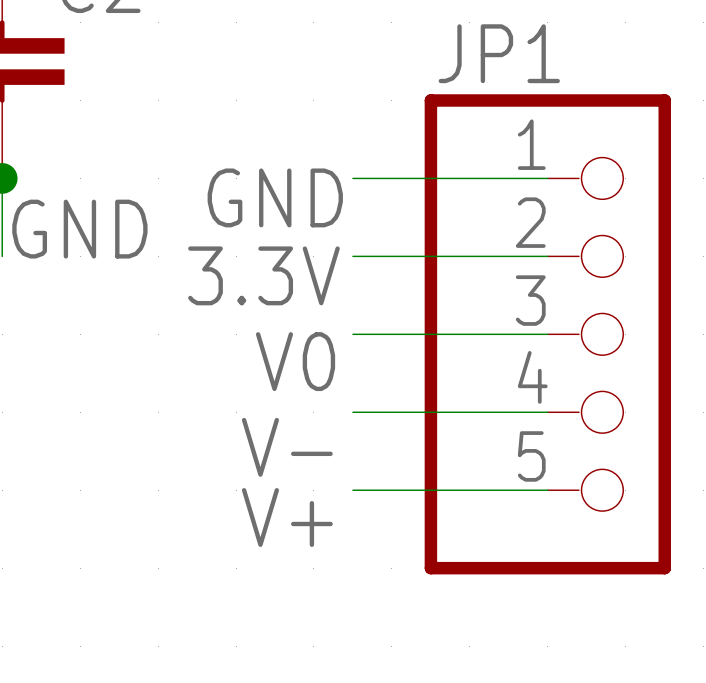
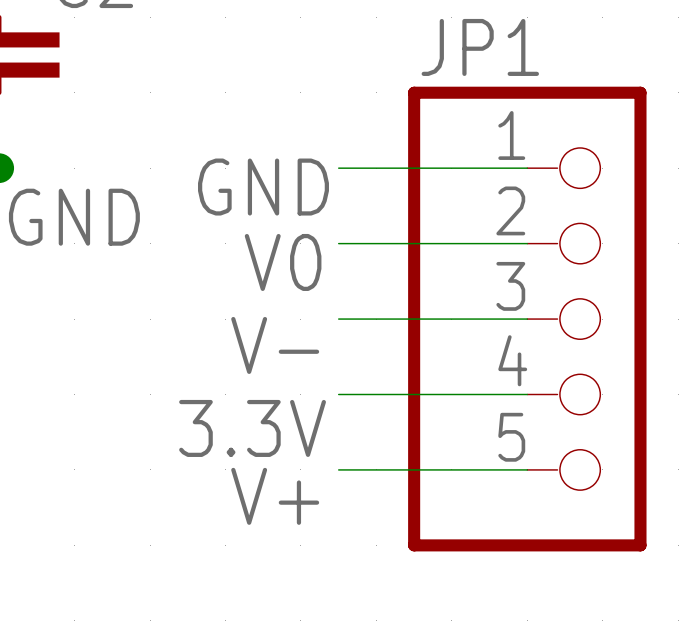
label: 3.3V (263, 275) -> V0 (283, 262)
label: V0 (295, 361) -> V- (275, 345)
label: V- (287, 447) -> 3.3V (252, 428)

